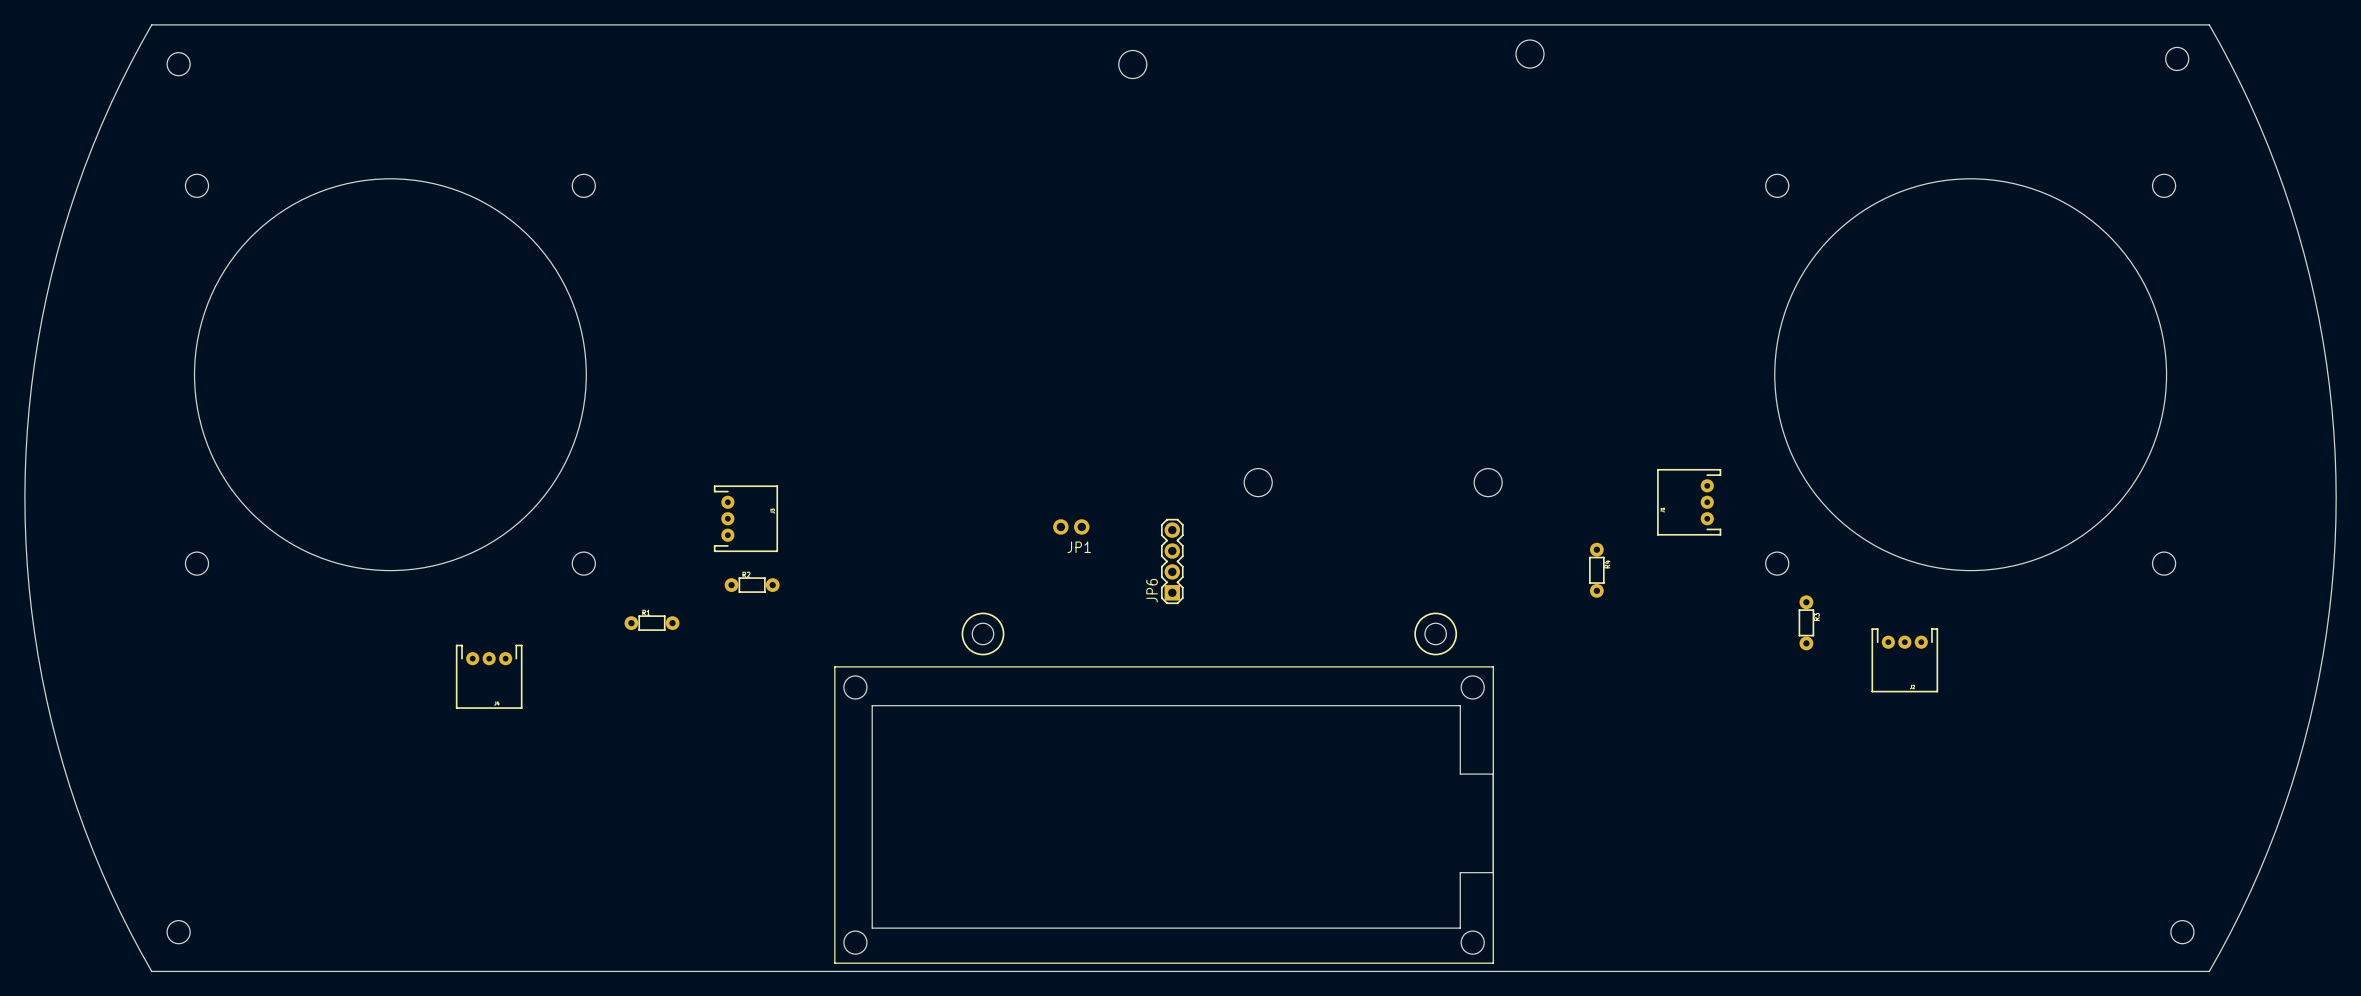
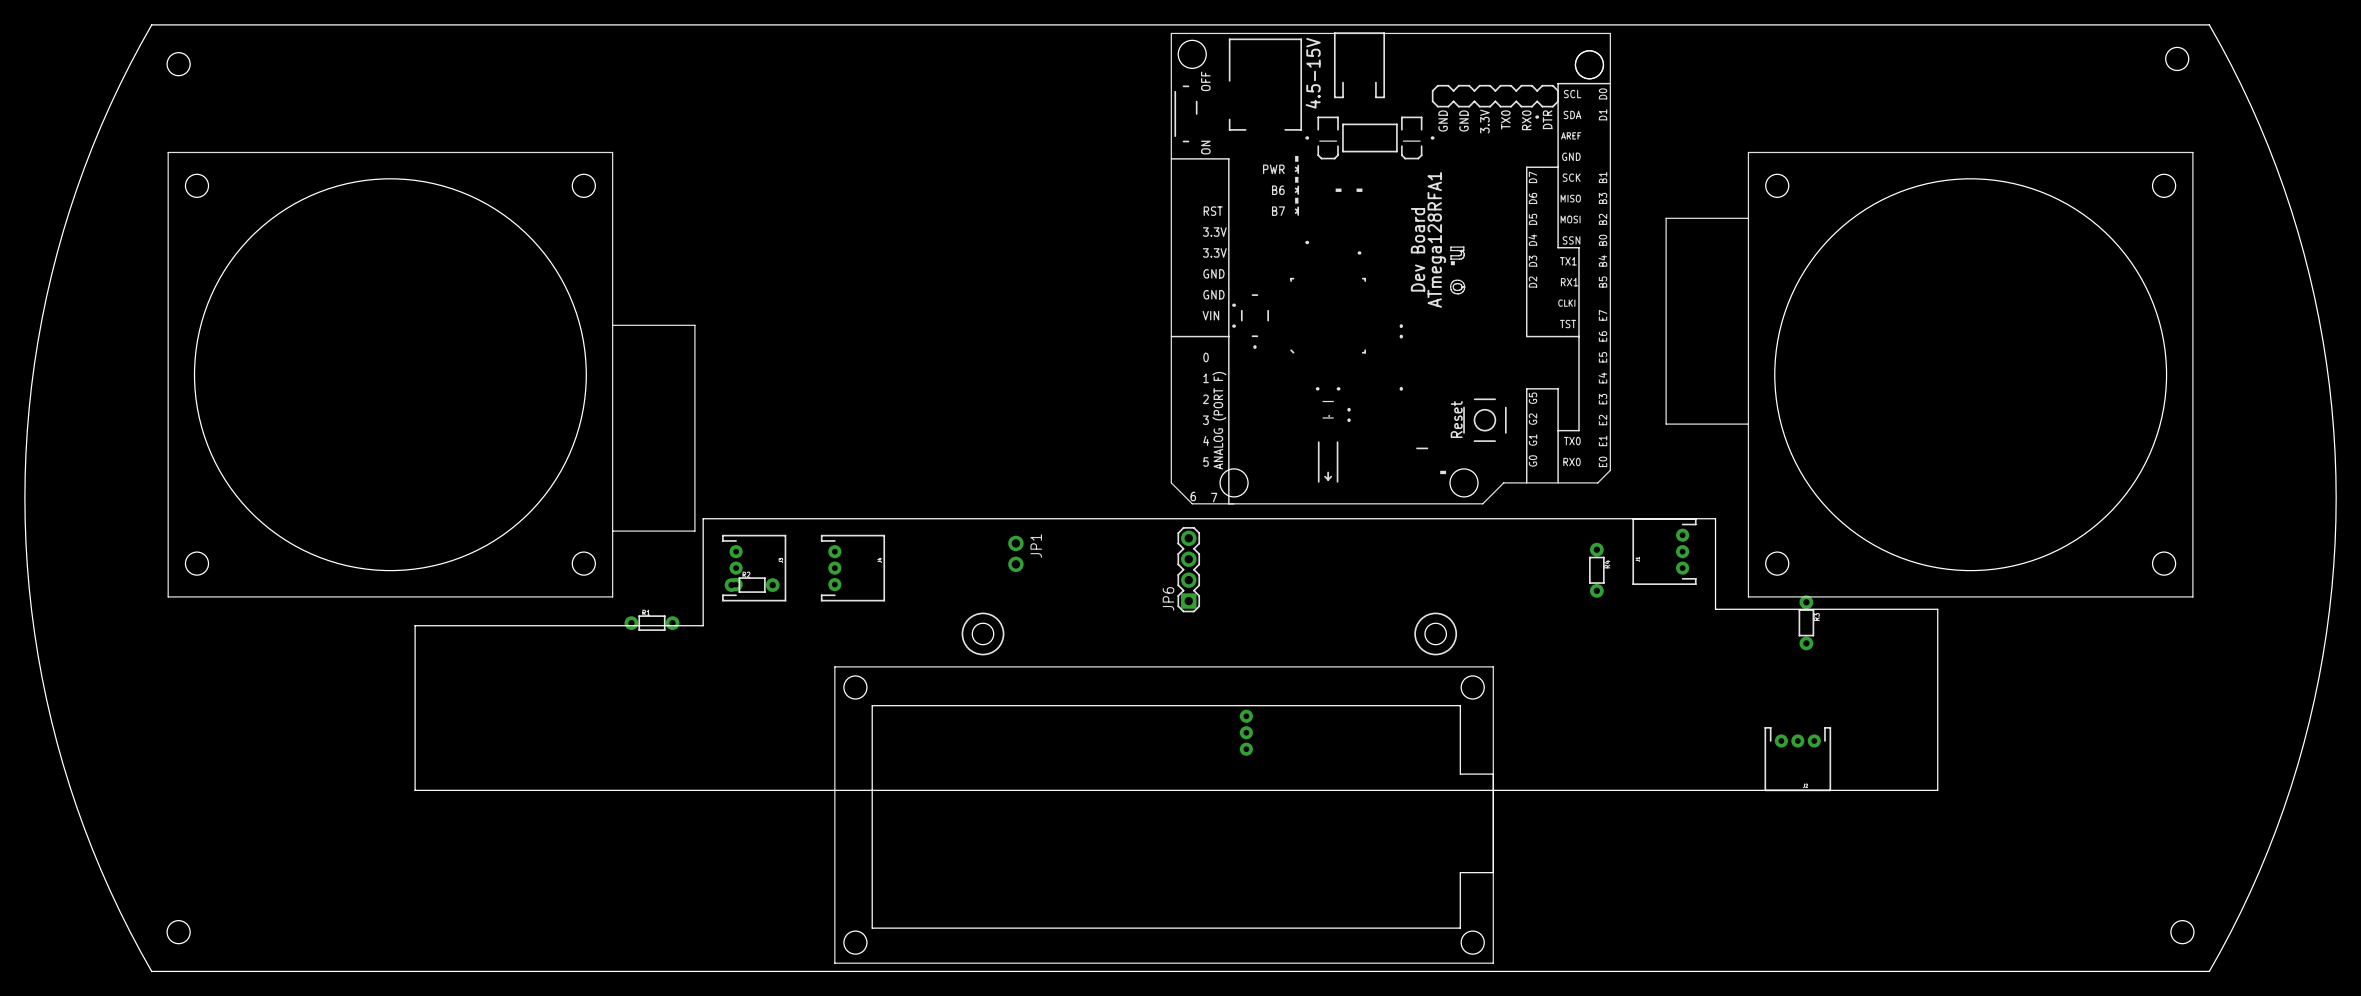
drawing: none -> [1170, 32, 1612, 505]
drawing: [1118, 39, 1545, 498] -> none
part: none -> (431, 374)
part: none -> (1929, 374)
part position: (1689, 502) -> (1664, 551)
board edge: none -> (703, 518) (1715, 518) (1715, 609) (1937, 609) (1937, 790) (415, 790) (415, 625) (703, 625) (703, 518)
part position: (745, 518) -> (754, 568)
JP1 rotation: 0° (1071, 526) -> 90° clockwise (1015, 553)
JP1 position: (1071, 526) -> (1015, 553)
JP1 name position: JP1 (1079, 547) -> JP1 (1036, 546)
JP6 position: (1172, 561) -> (1188, 569)
part position: (1904, 660) -> (1797, 759)
part rotation: 0° (489, 676) -> 90° counterclockwise (852, 568)
part position: (489, 676) -> (852, 568)
part: none -> (1246, 732)

